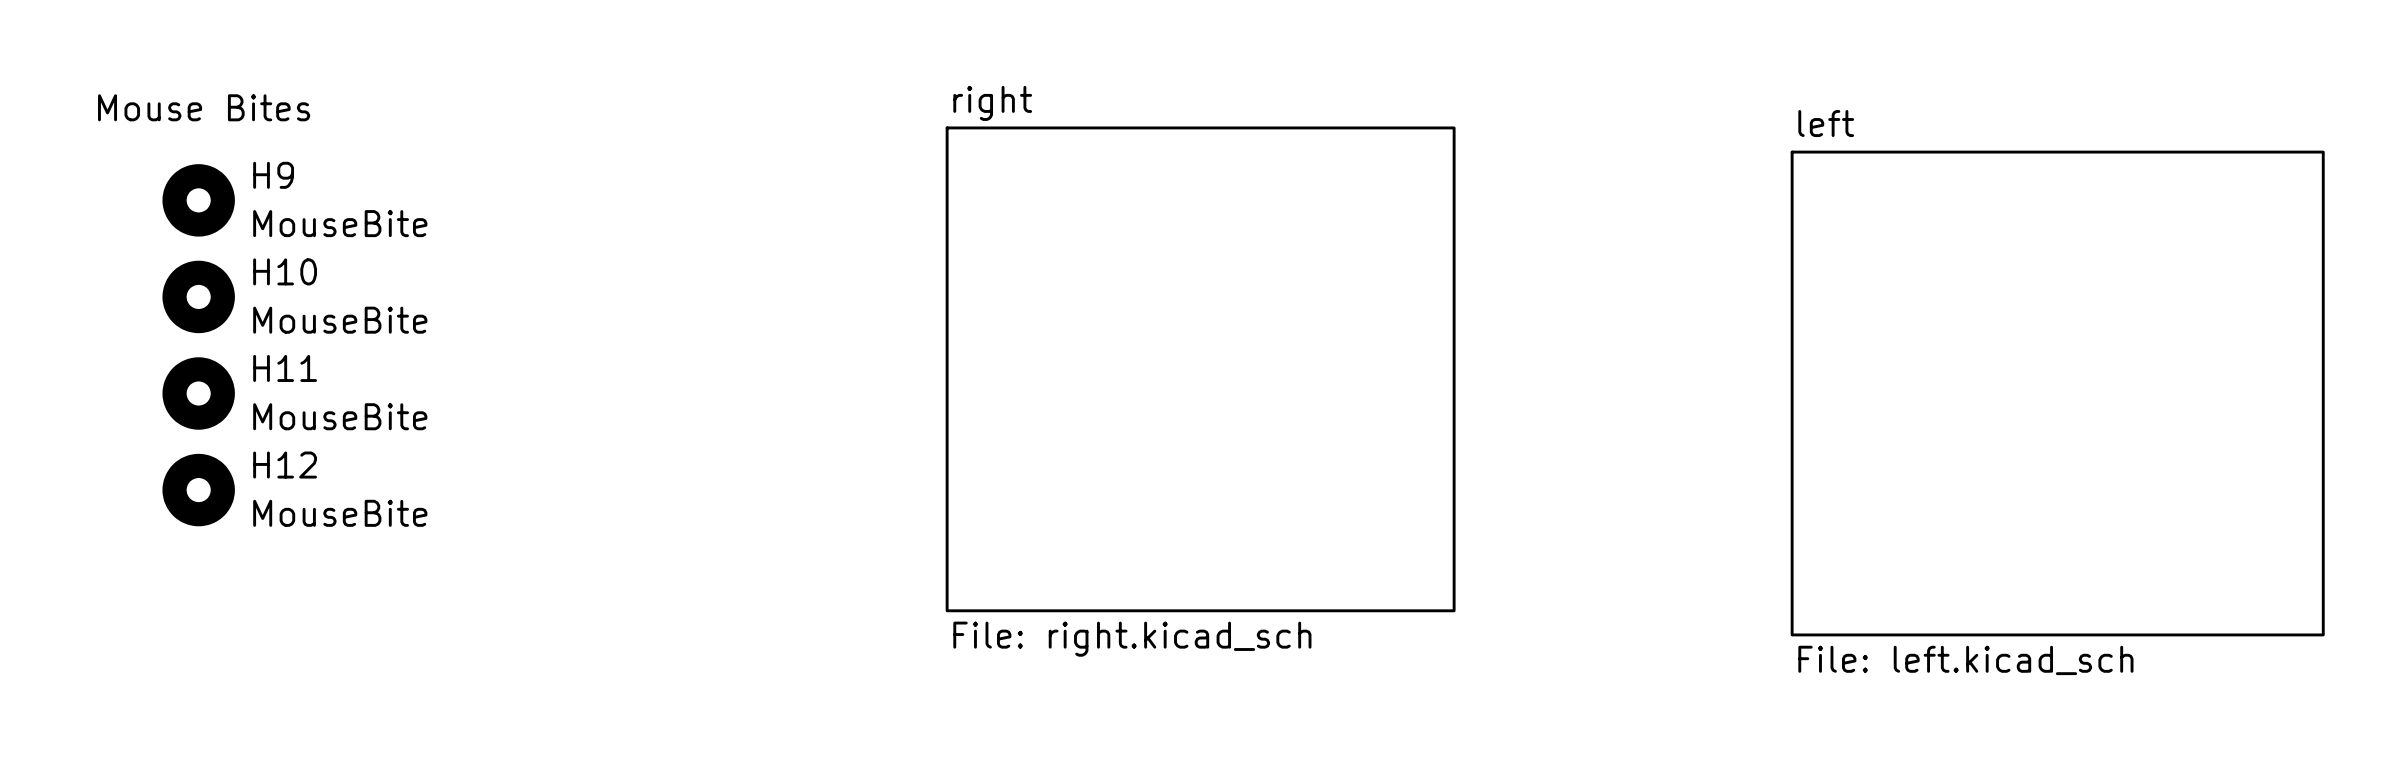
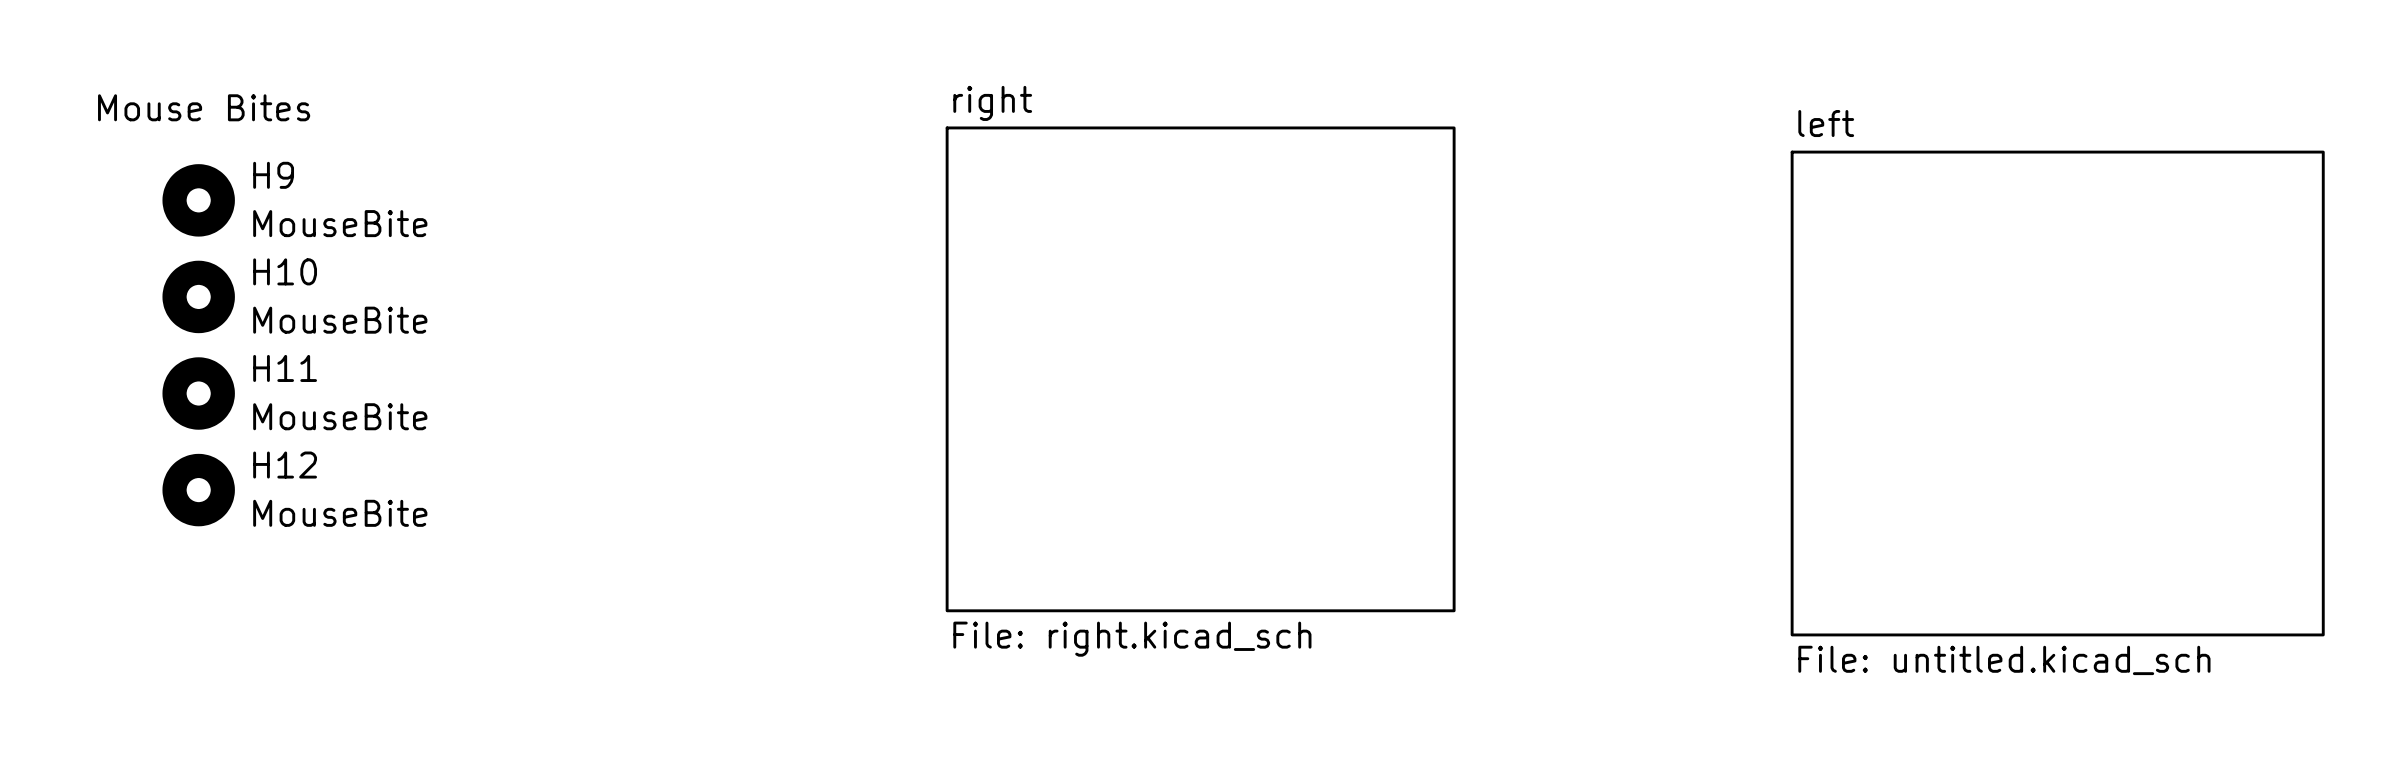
sheet left value: File: left.kicad_sch (1965, 660) -> File: untitled.kicad_sch (2004, 660)

